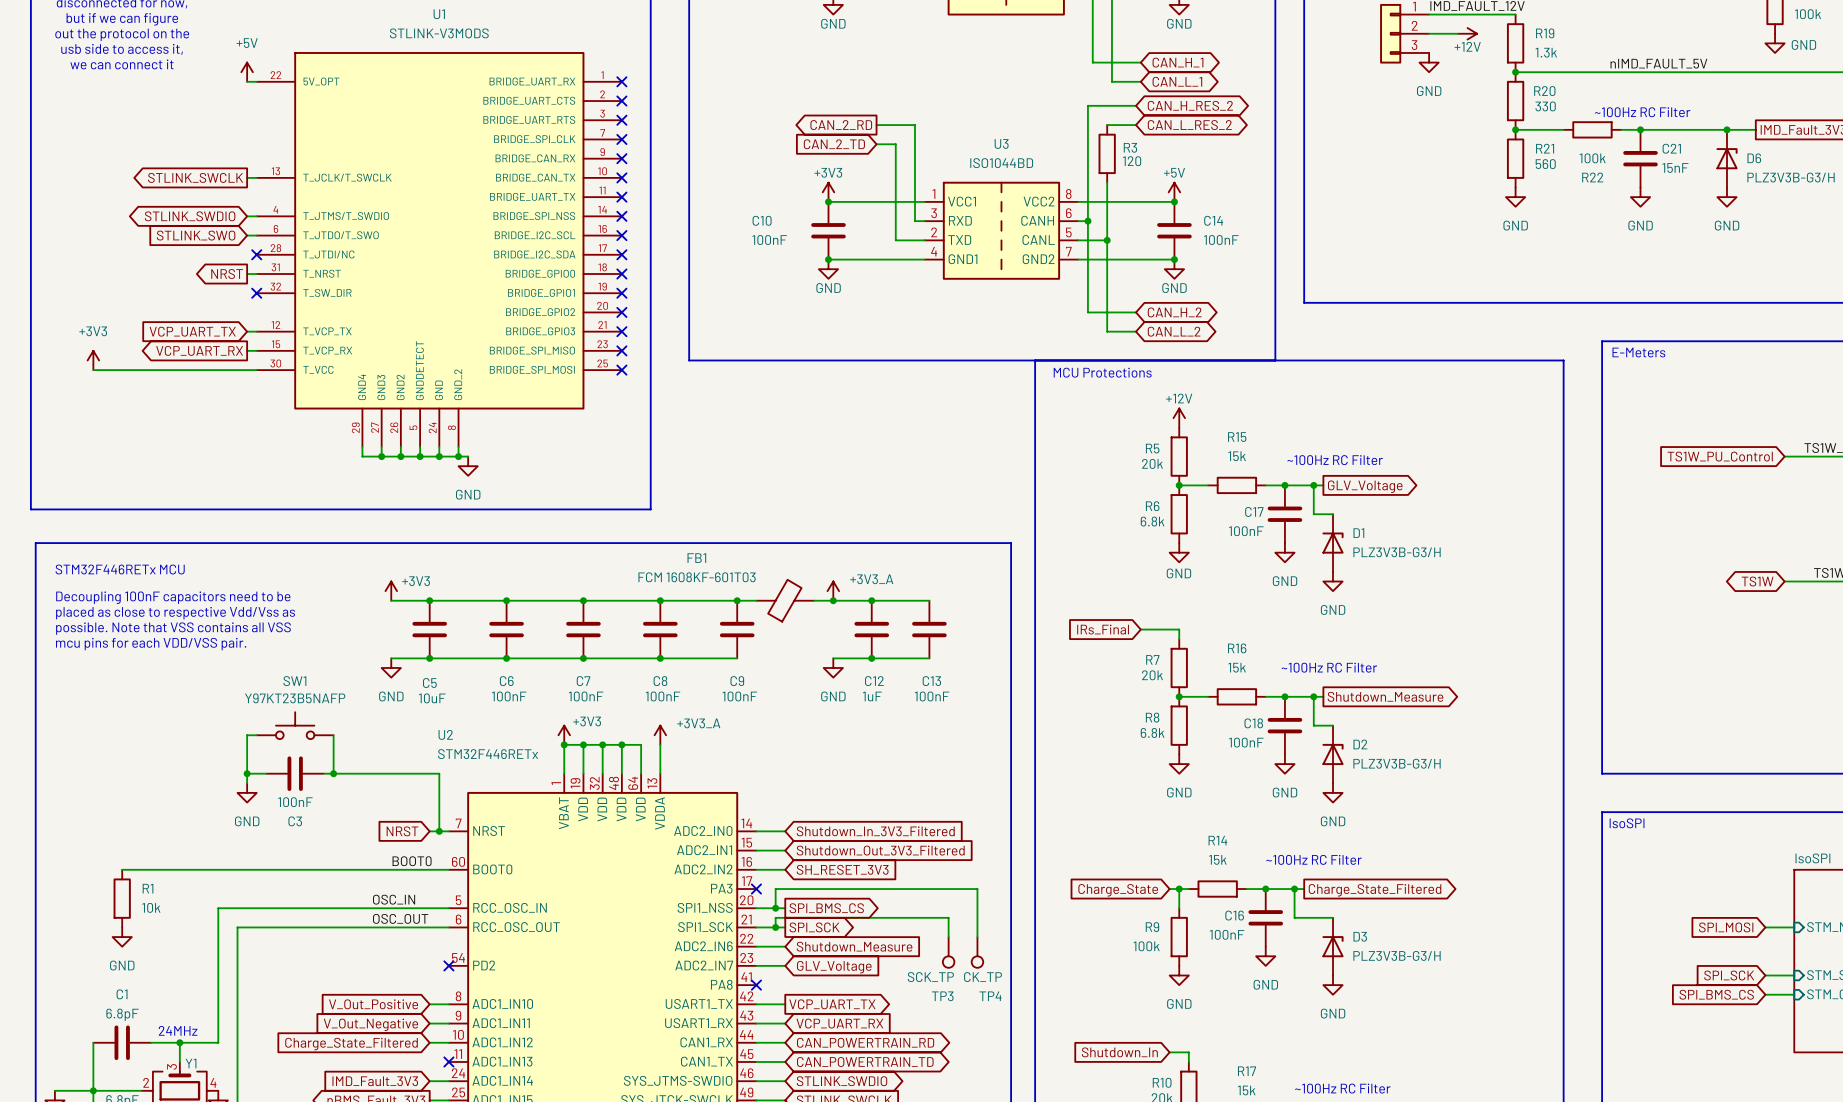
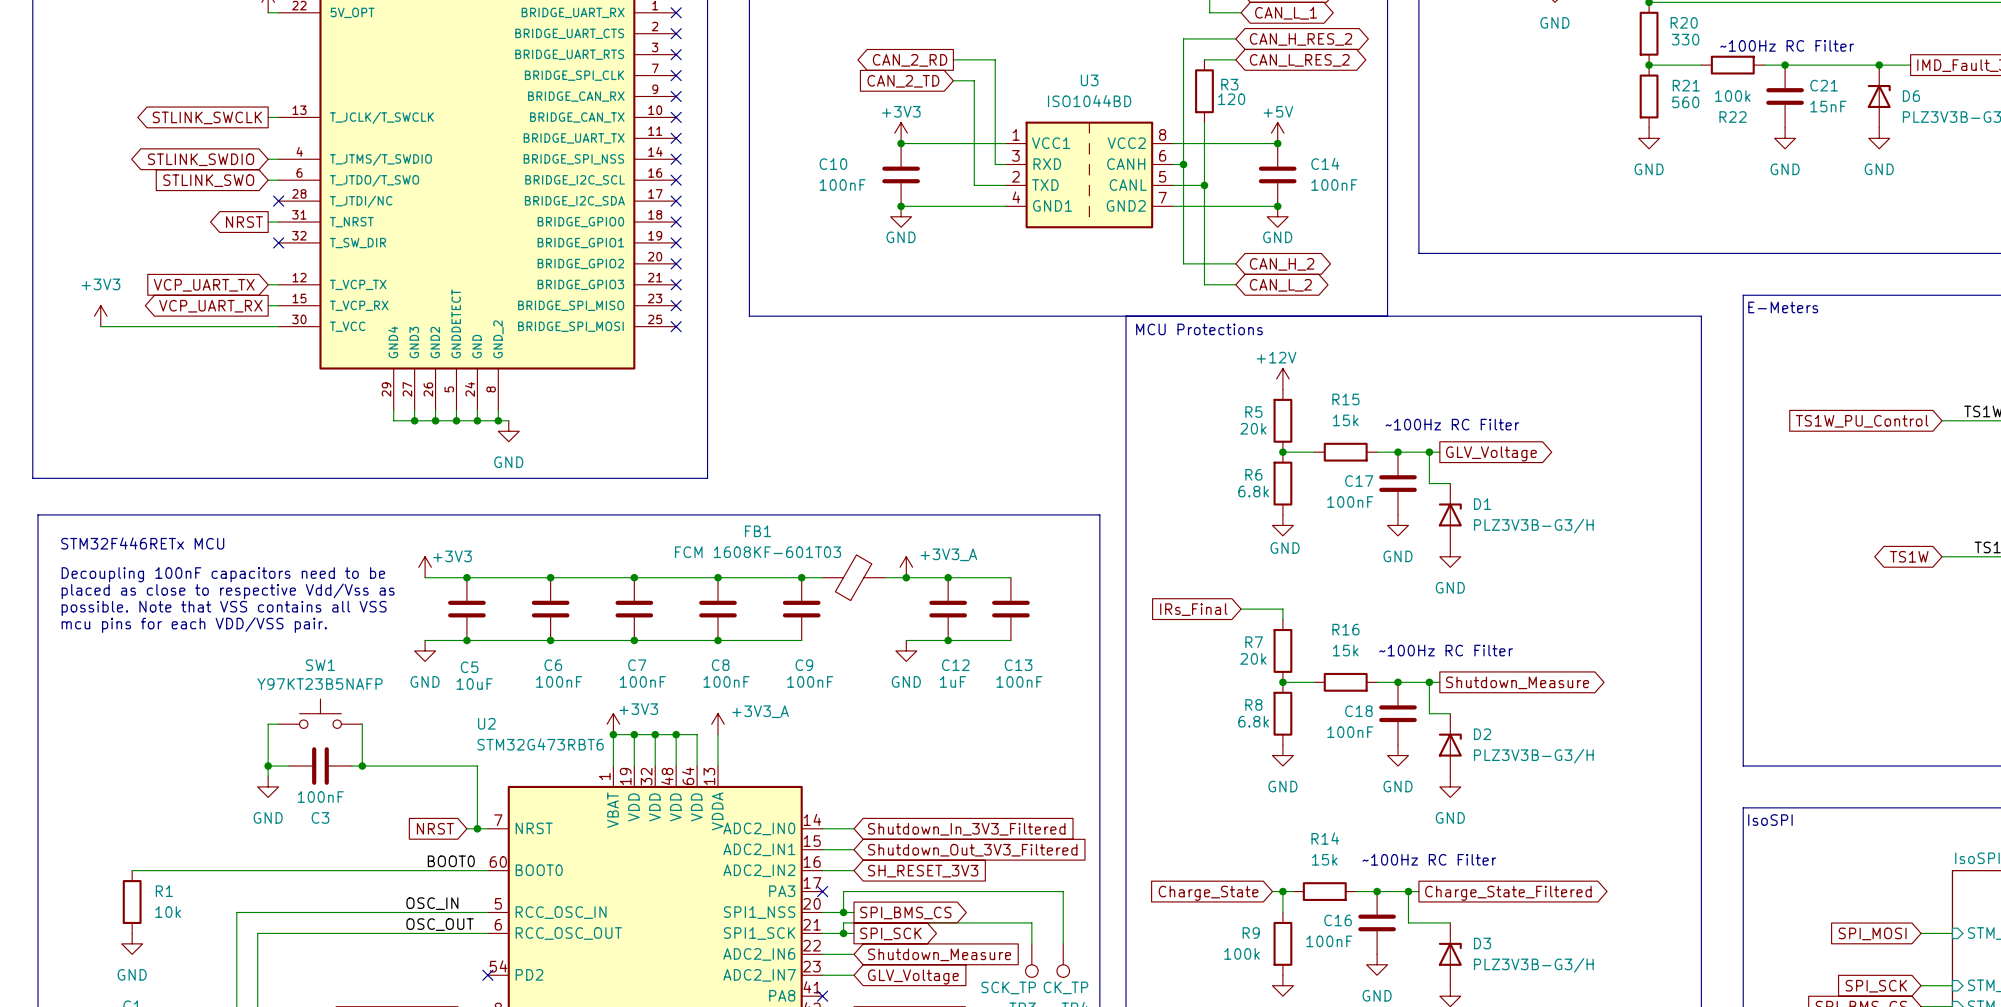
U2 value: STM32F446RETx (488, 754) -> STM32G473RBT6 (540, 744)

